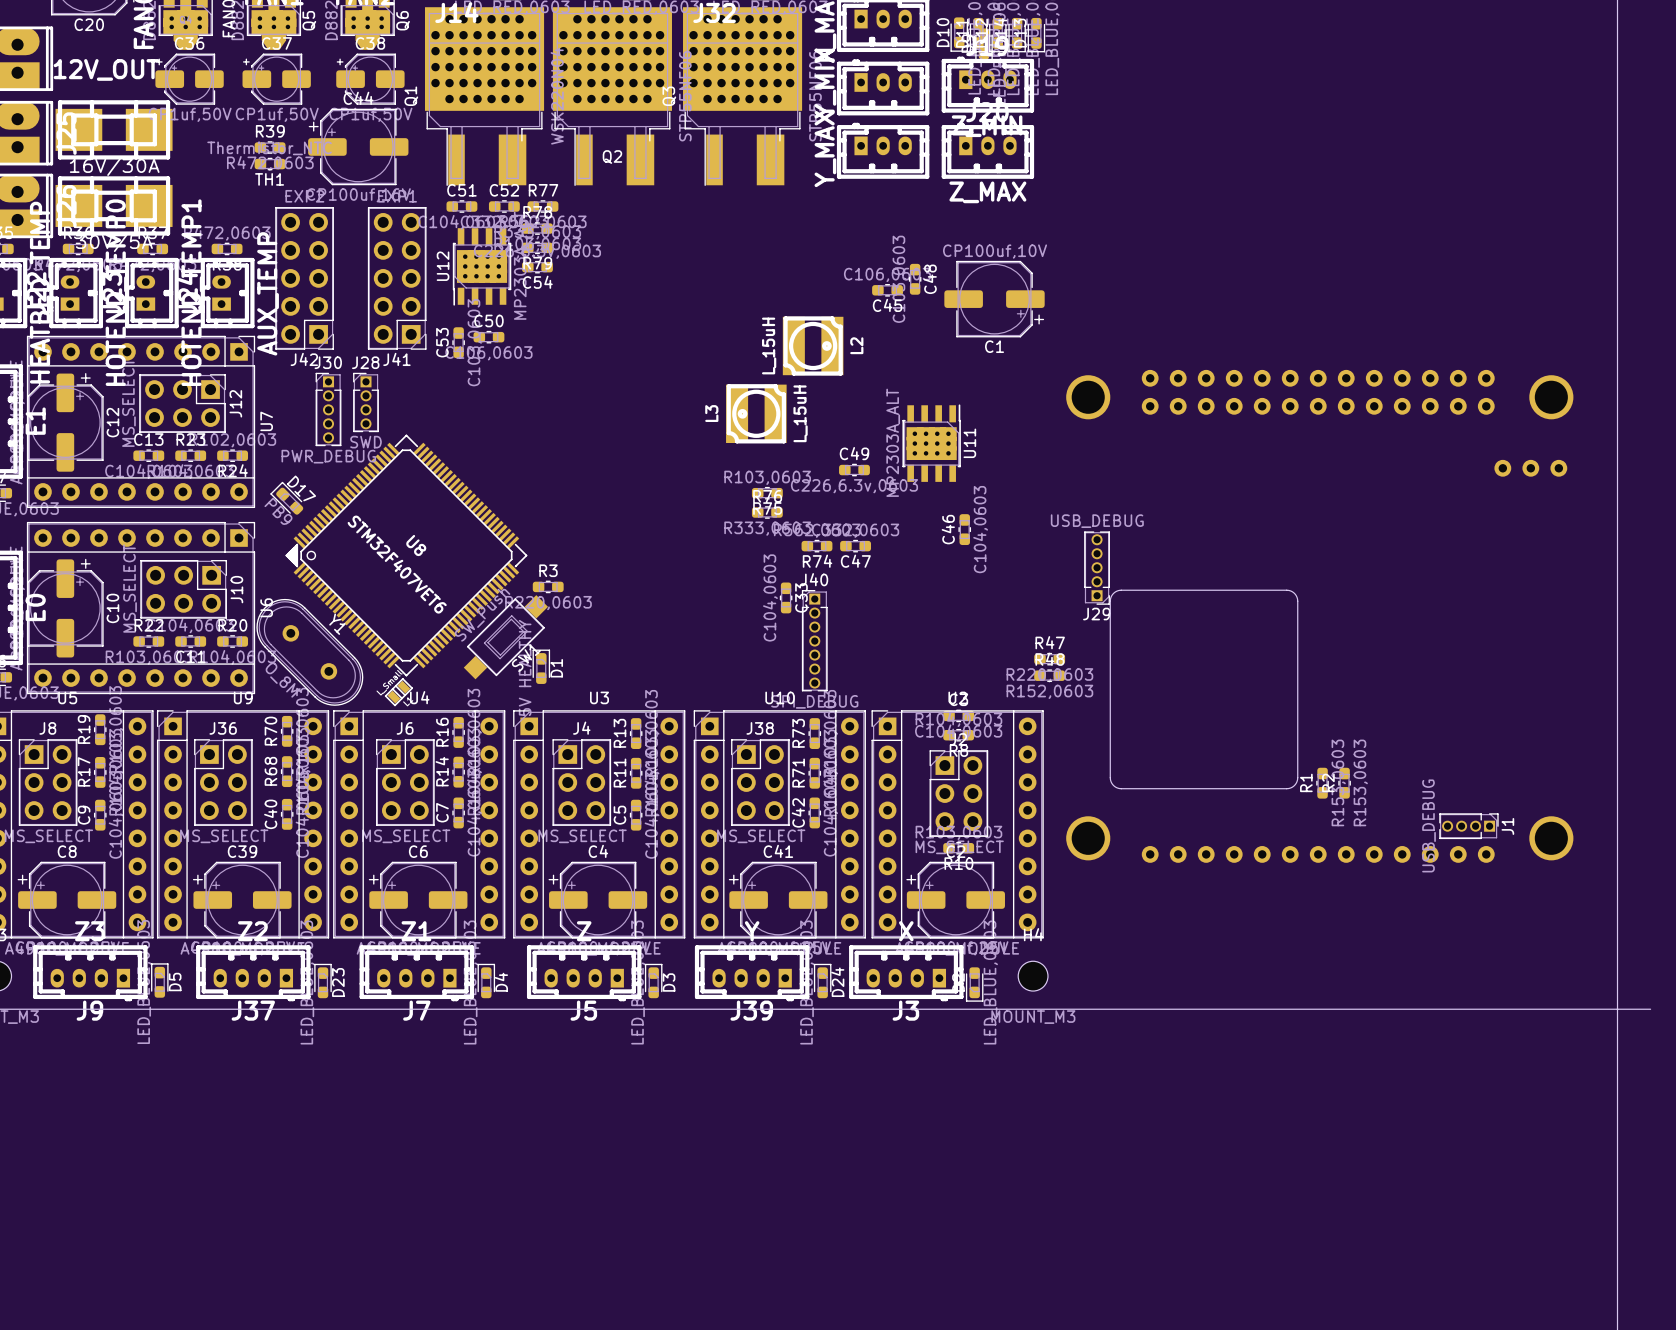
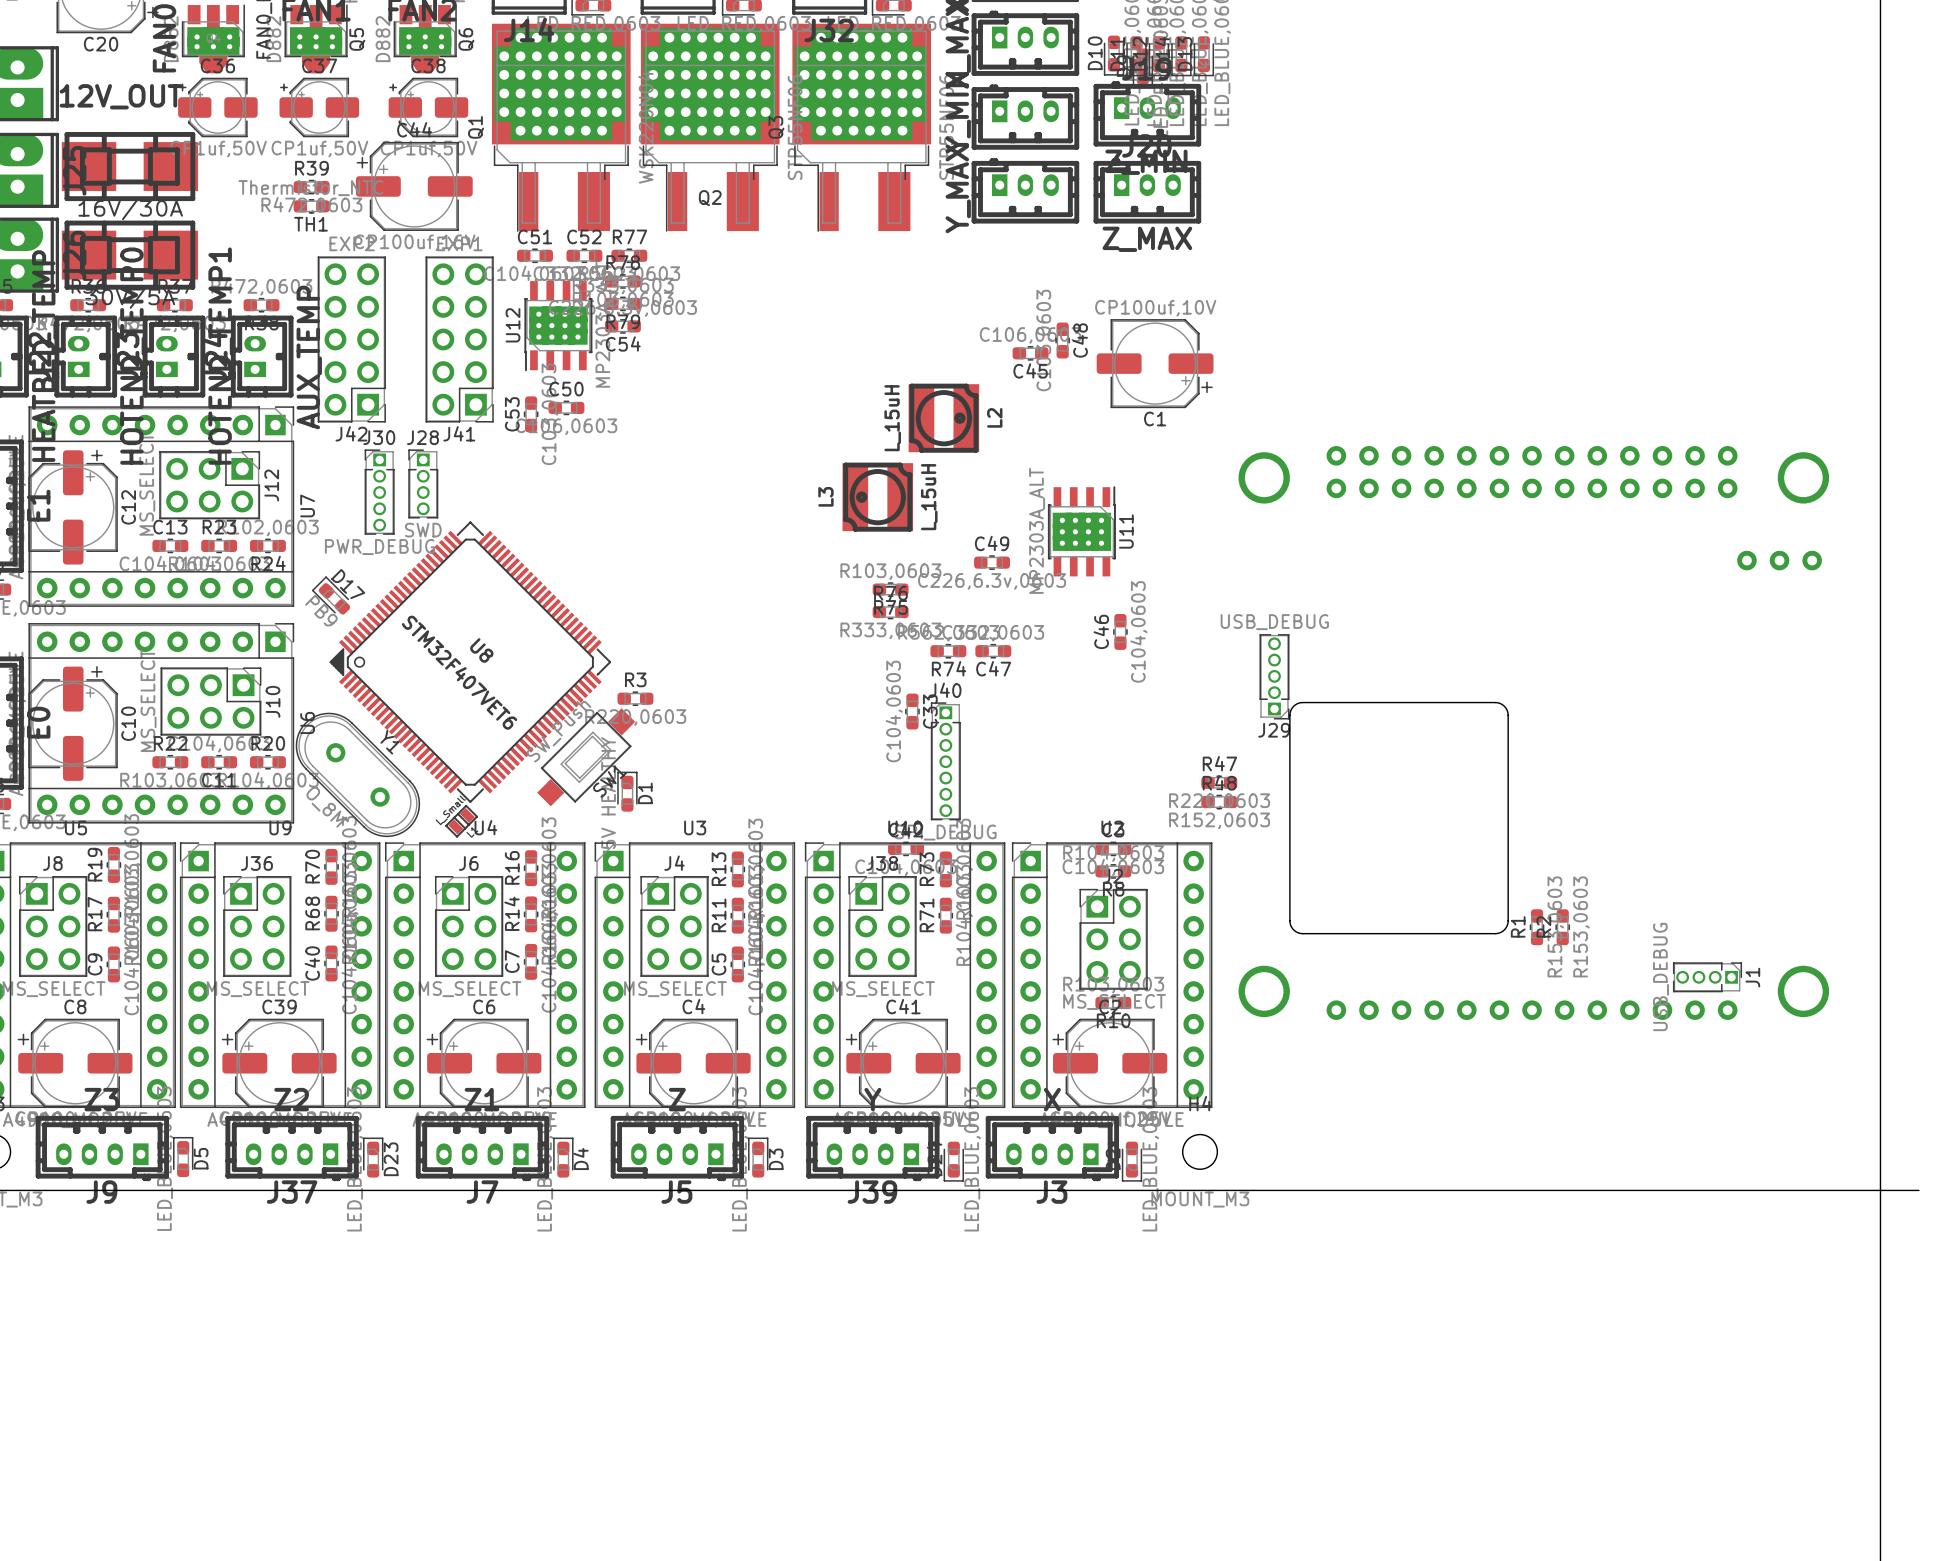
C42 rotation: 0° (814, 812) -> 90° clockwise (906, 848)
C42 position: (814, 812) -> (906, 848)
D24 rotation: 0° (822, 981) -> 180° (953, 1161)

